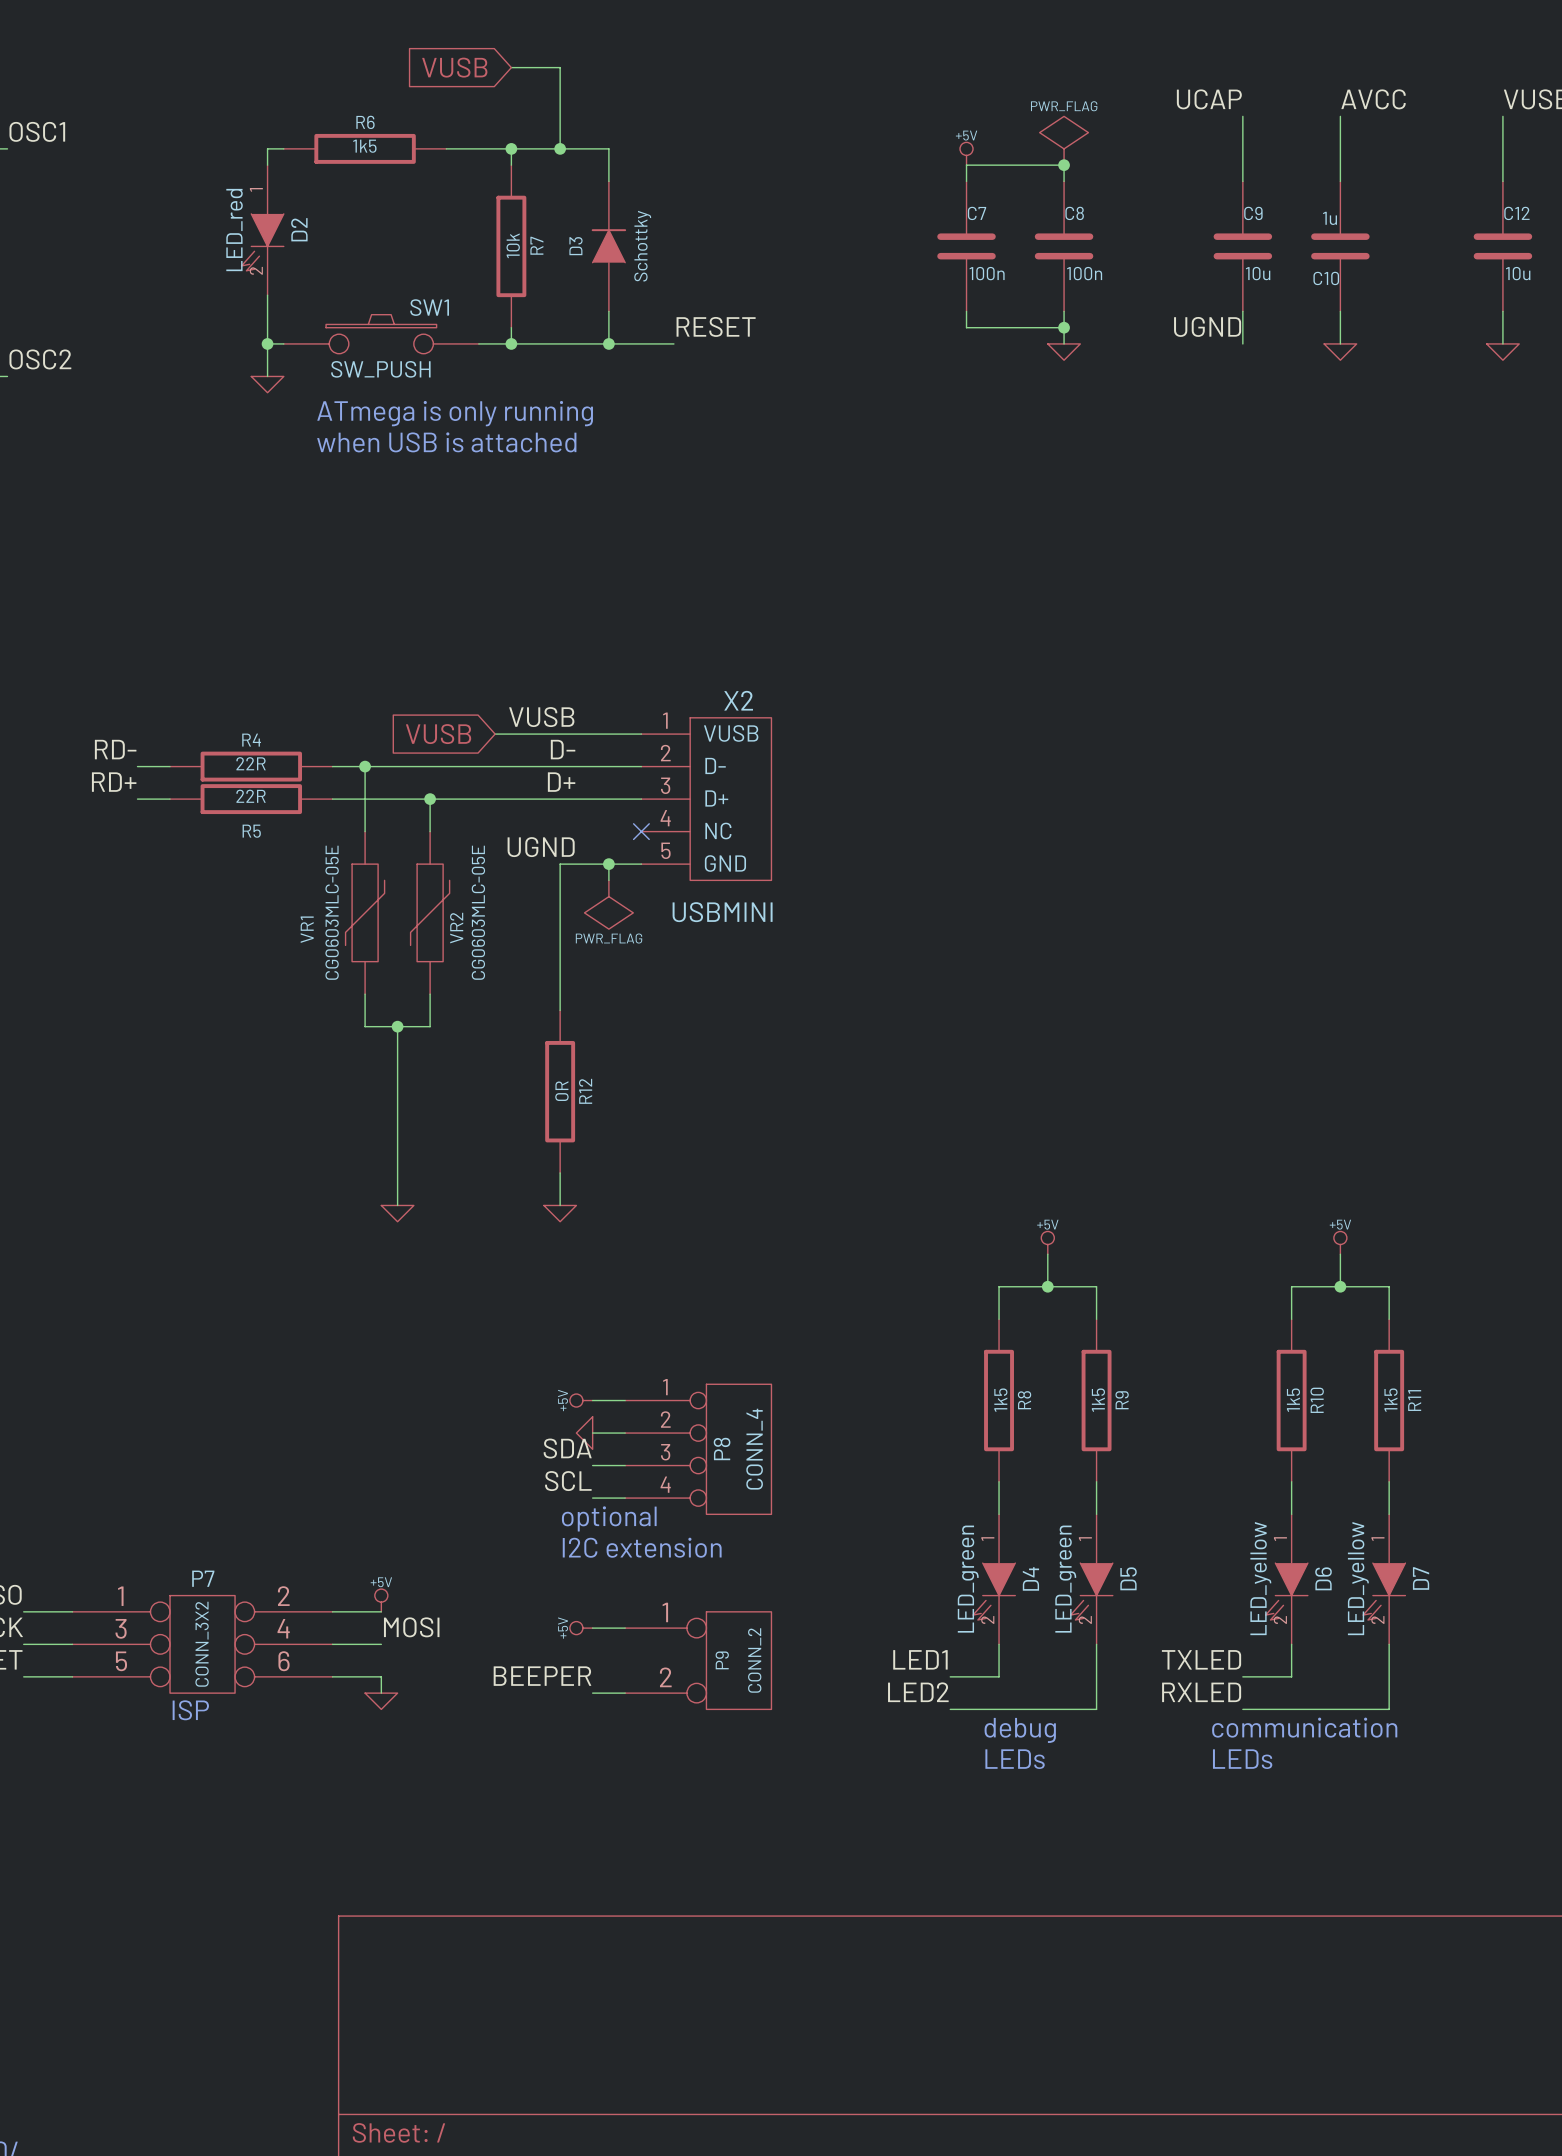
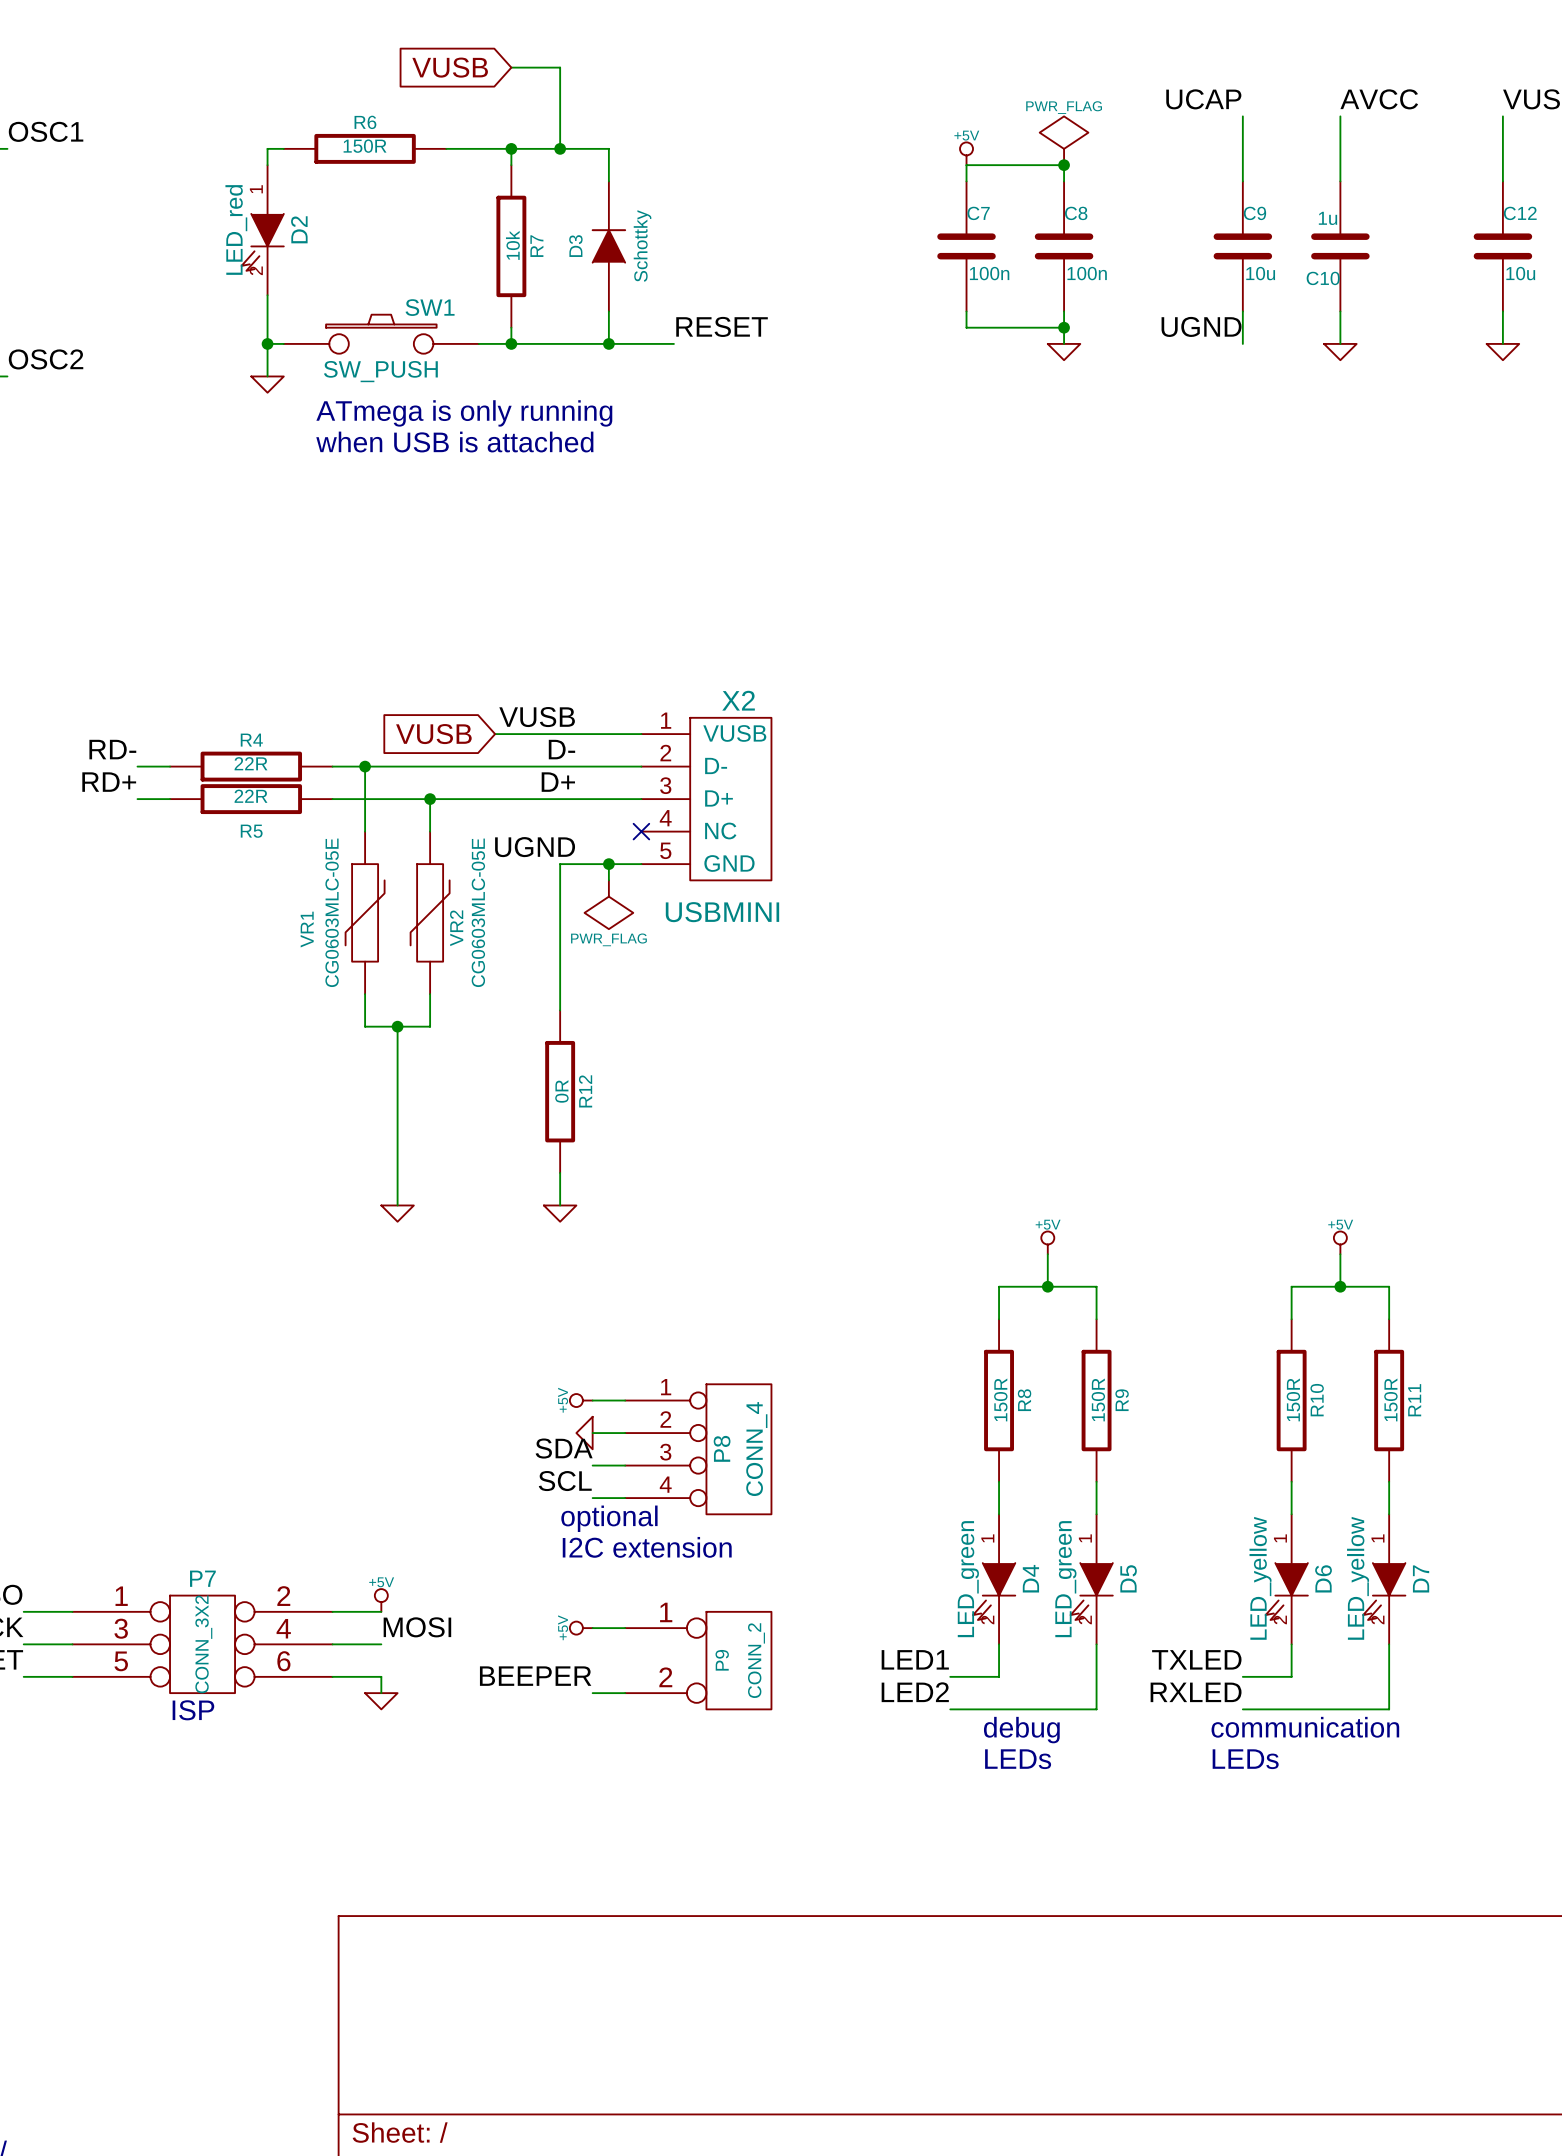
R6 value: 1k5 (364, 146) -> 150R (365, 146)
R8 value: 1k5 (1000, 1400) -> 150R (1000, 1399)
R9 value: 1k5 (1098, 1400) -> 150R (1098, 1399)
R10 value: 1k5 (1293, 1400) -> 150R (1293, 1399)
R11 value: 1k5 (1391, 1400) -> 150R (1390, 1399)

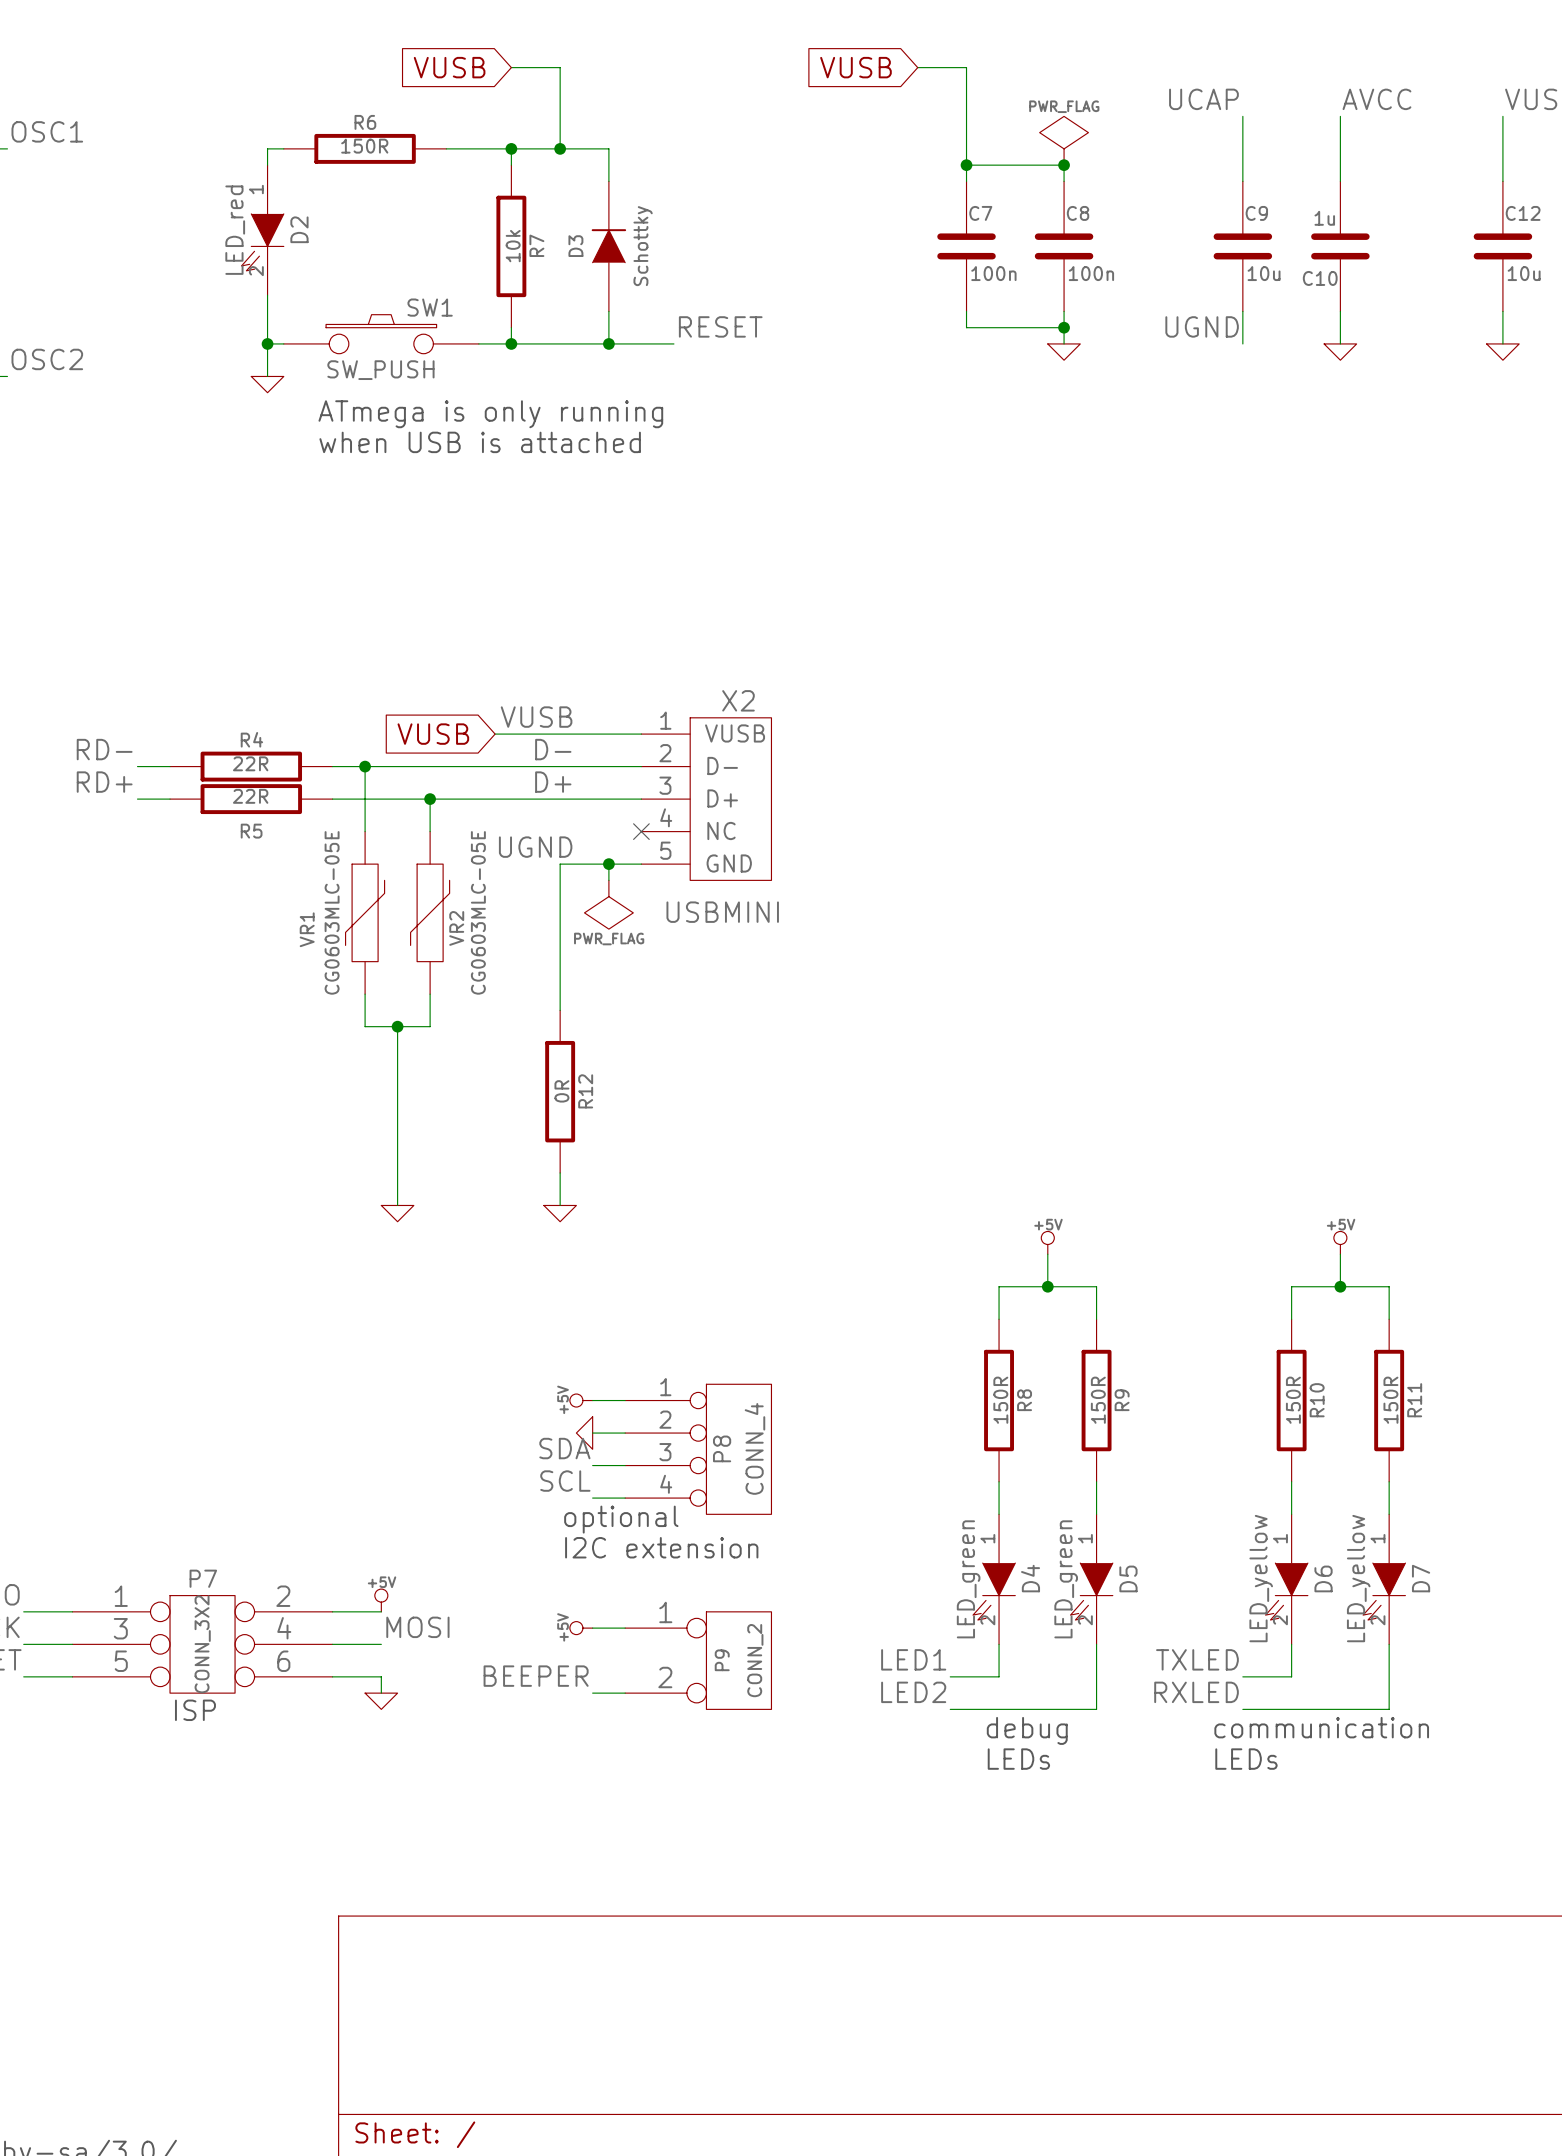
global label: none -> VUSB (855, 67)
wire: none -> (917, 67) (966, 67) (966, 165)
power symbol: +5V (966, 153) -> none
junction: none -> (966, 165)

